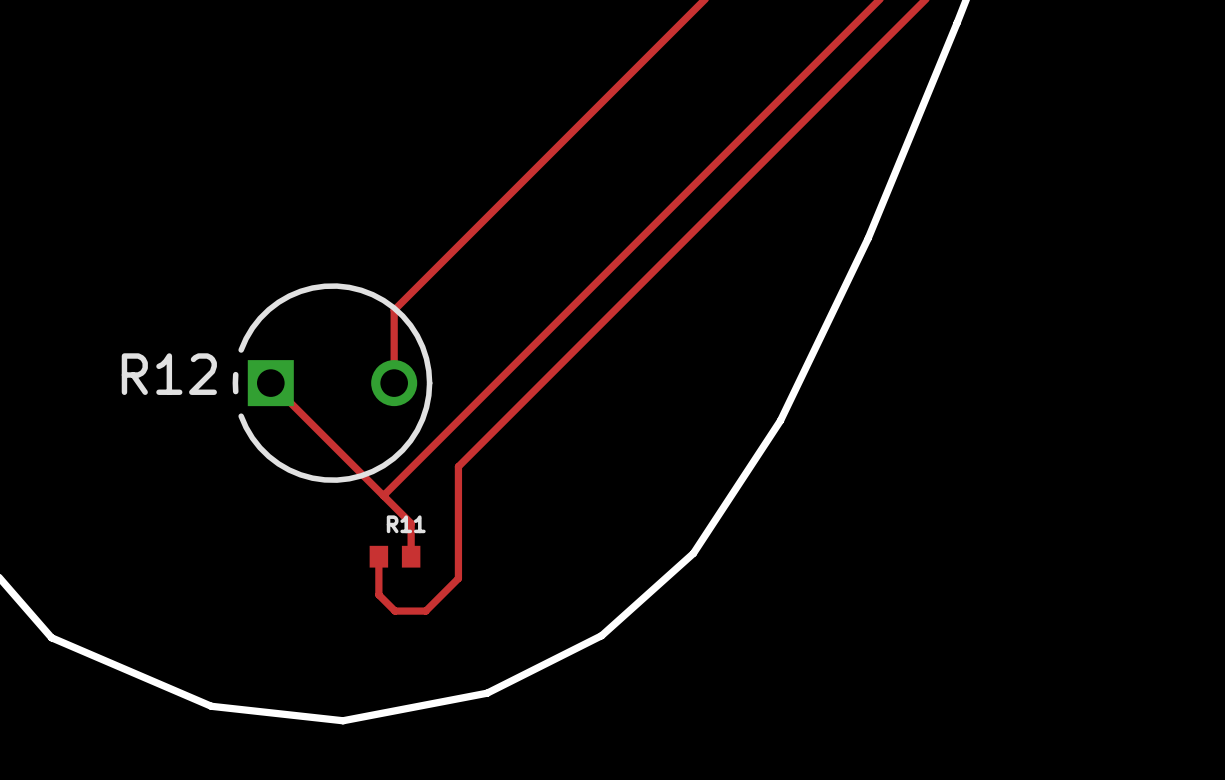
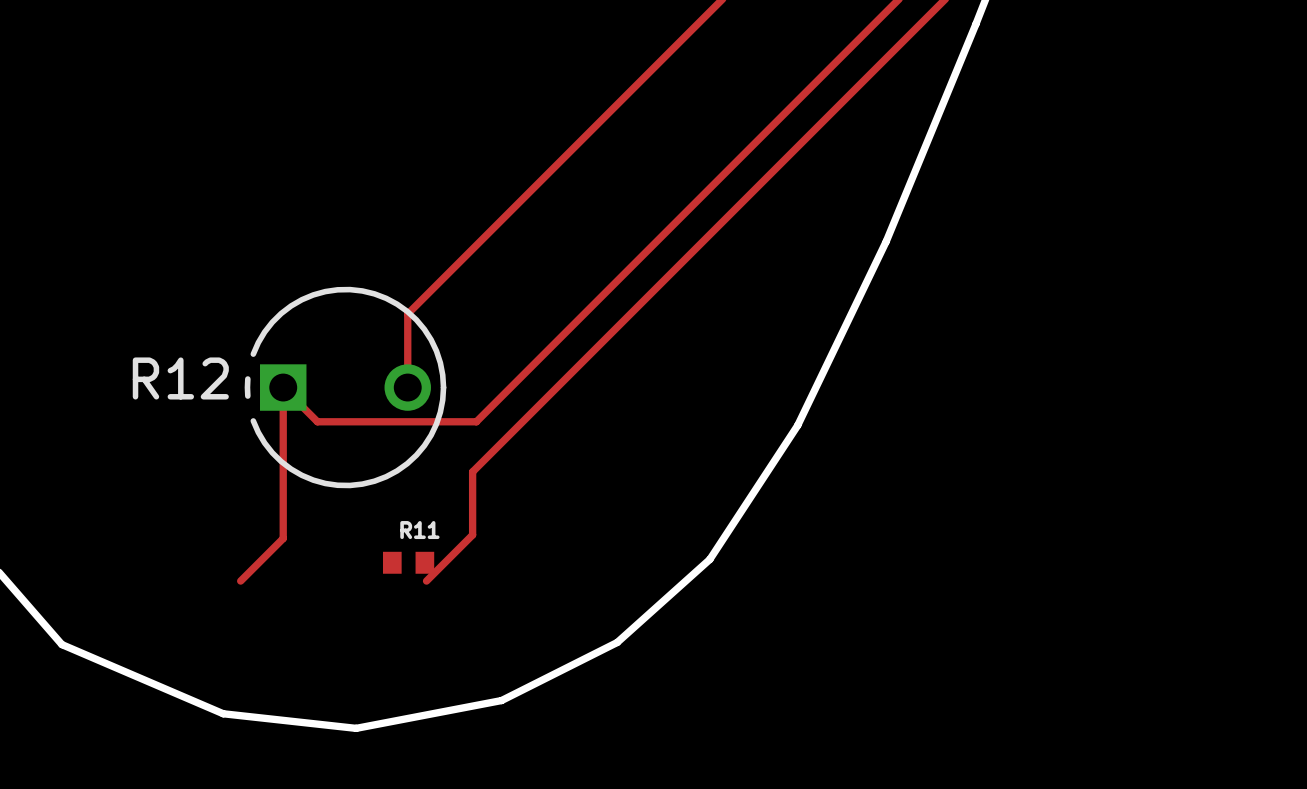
track: none -> (283, 387) (283, 538) (240, 581)
track: (304, 417) (411, 523) (411, 556) -> none
track: (462, 417) (383, 495) -> (476, 421) (317, 421)
track: (458, 529) (458, 578) (425, 611) (395, 611) (378, 594) (378, 556) -> (472, 534) (426, 581)

